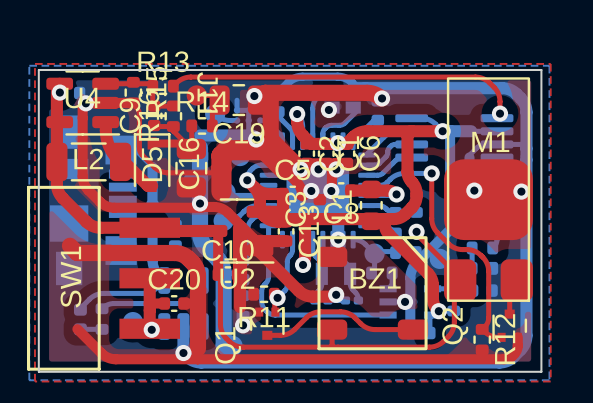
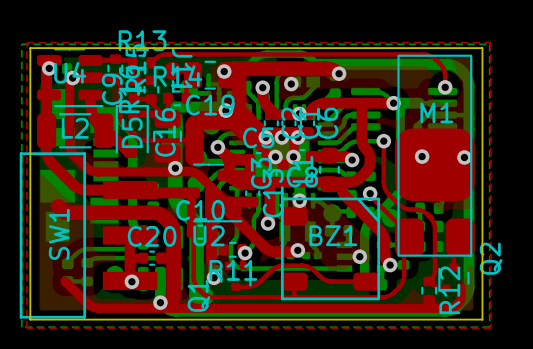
Q2 name position: Q2 (455, 326) -> Q2 (491, 258)

